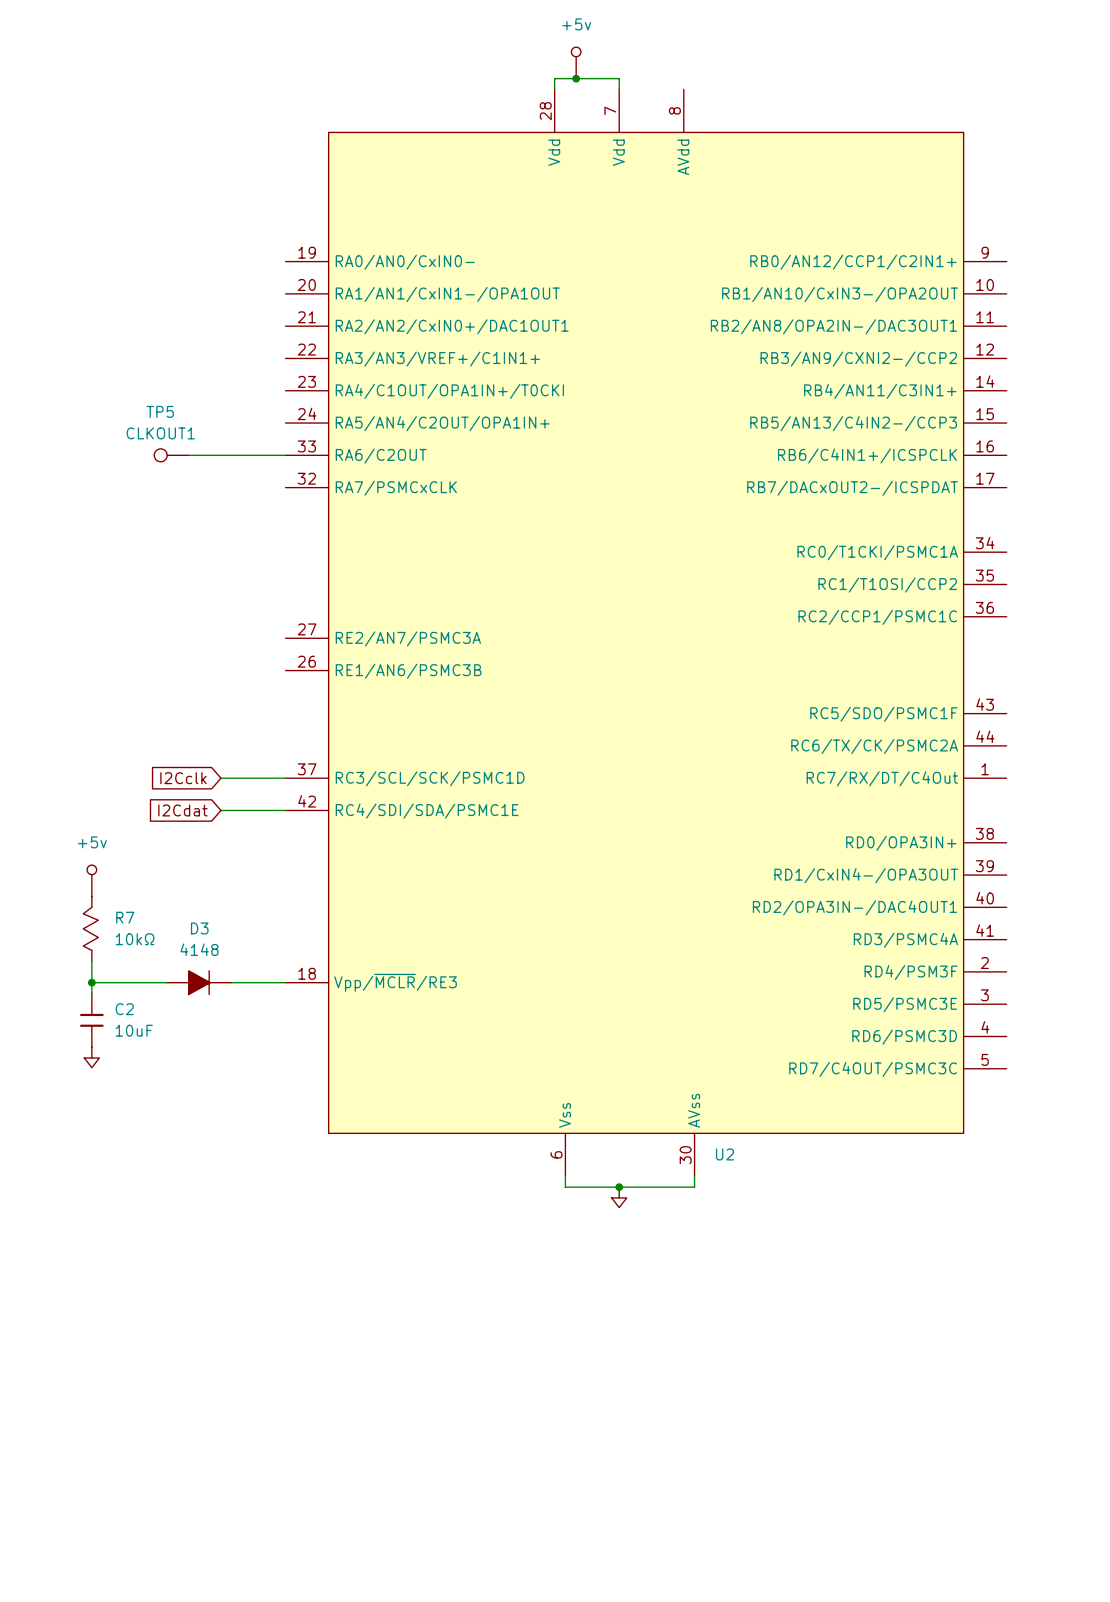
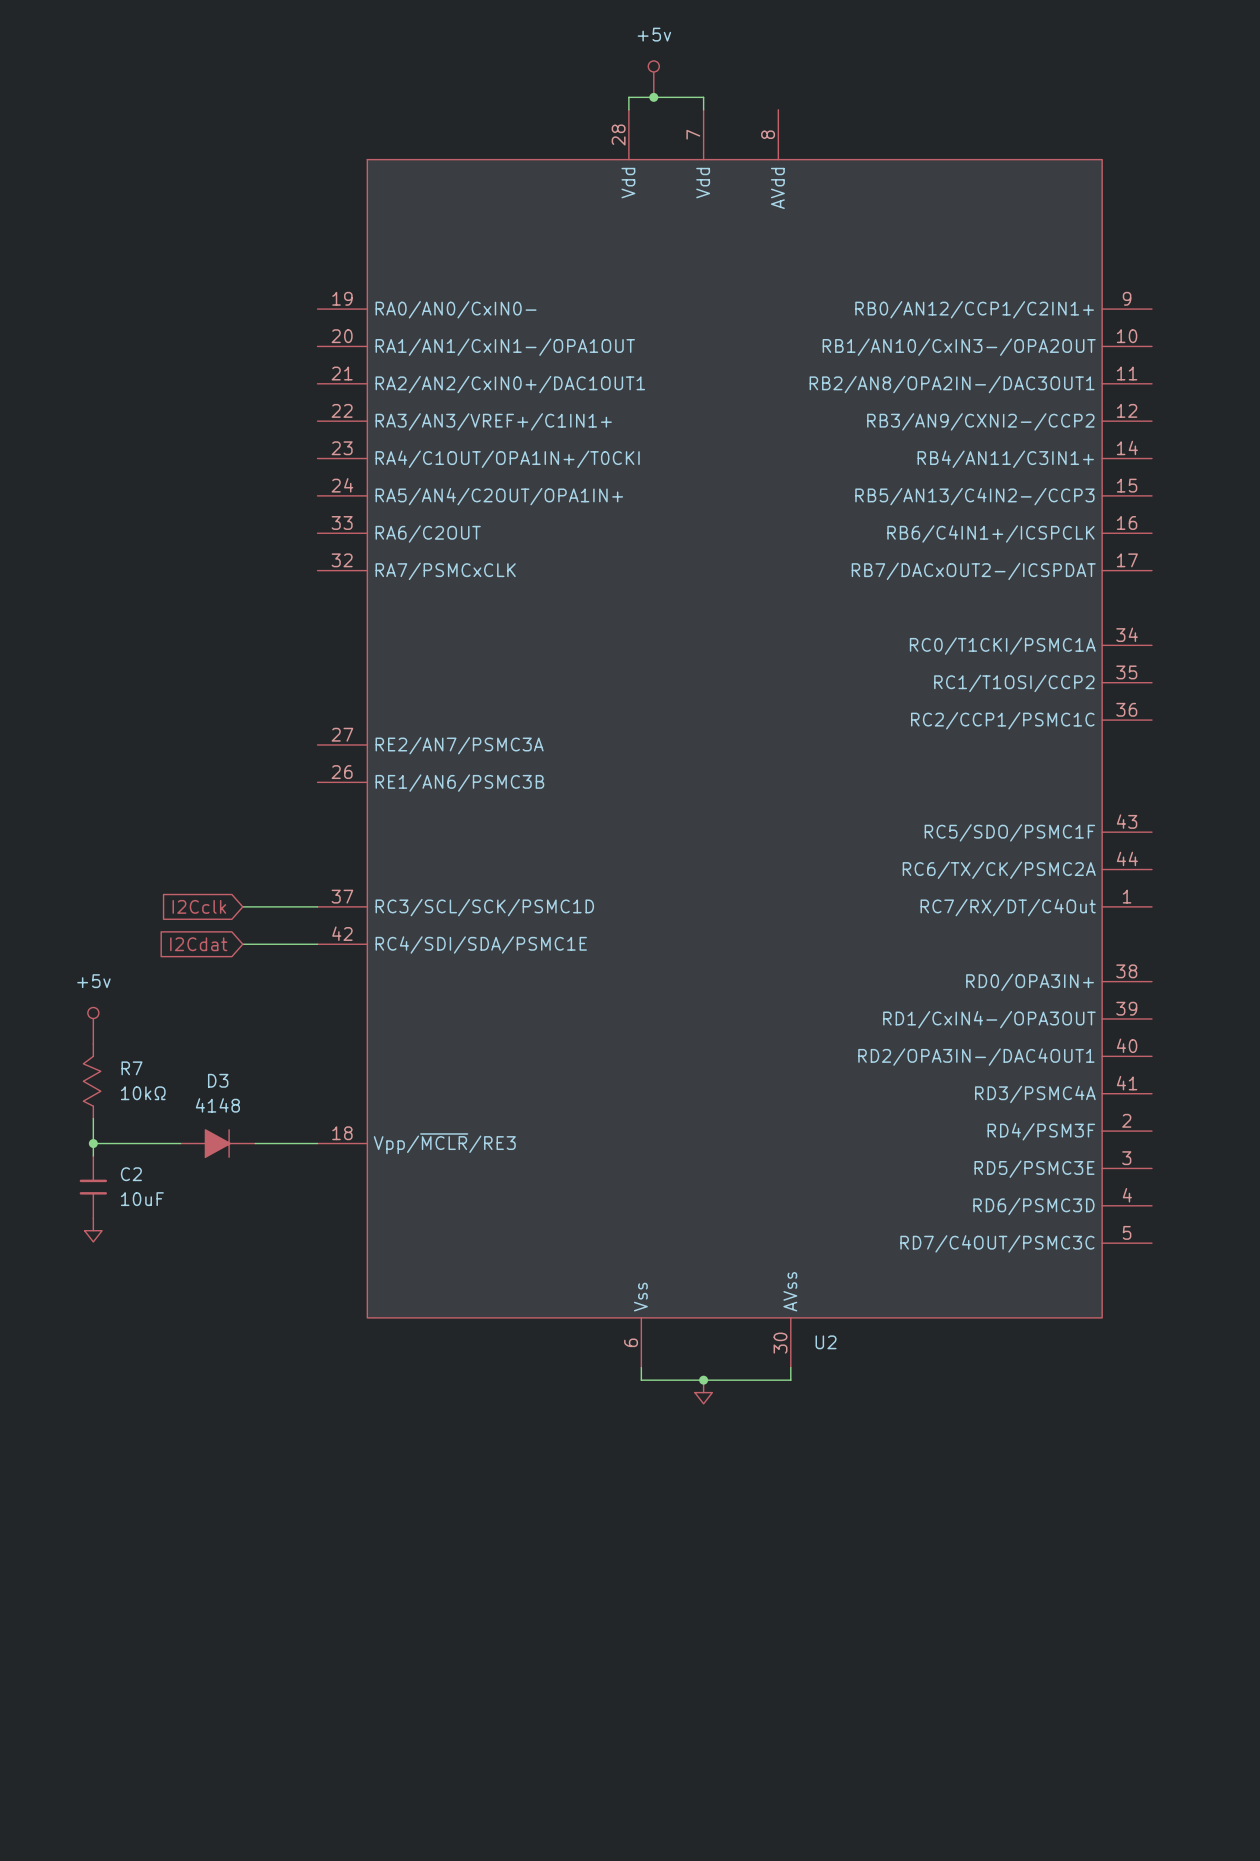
TP5: CLKOUT1 (171, 455) -> none
wire: (188, 455) (285, 455) -> none

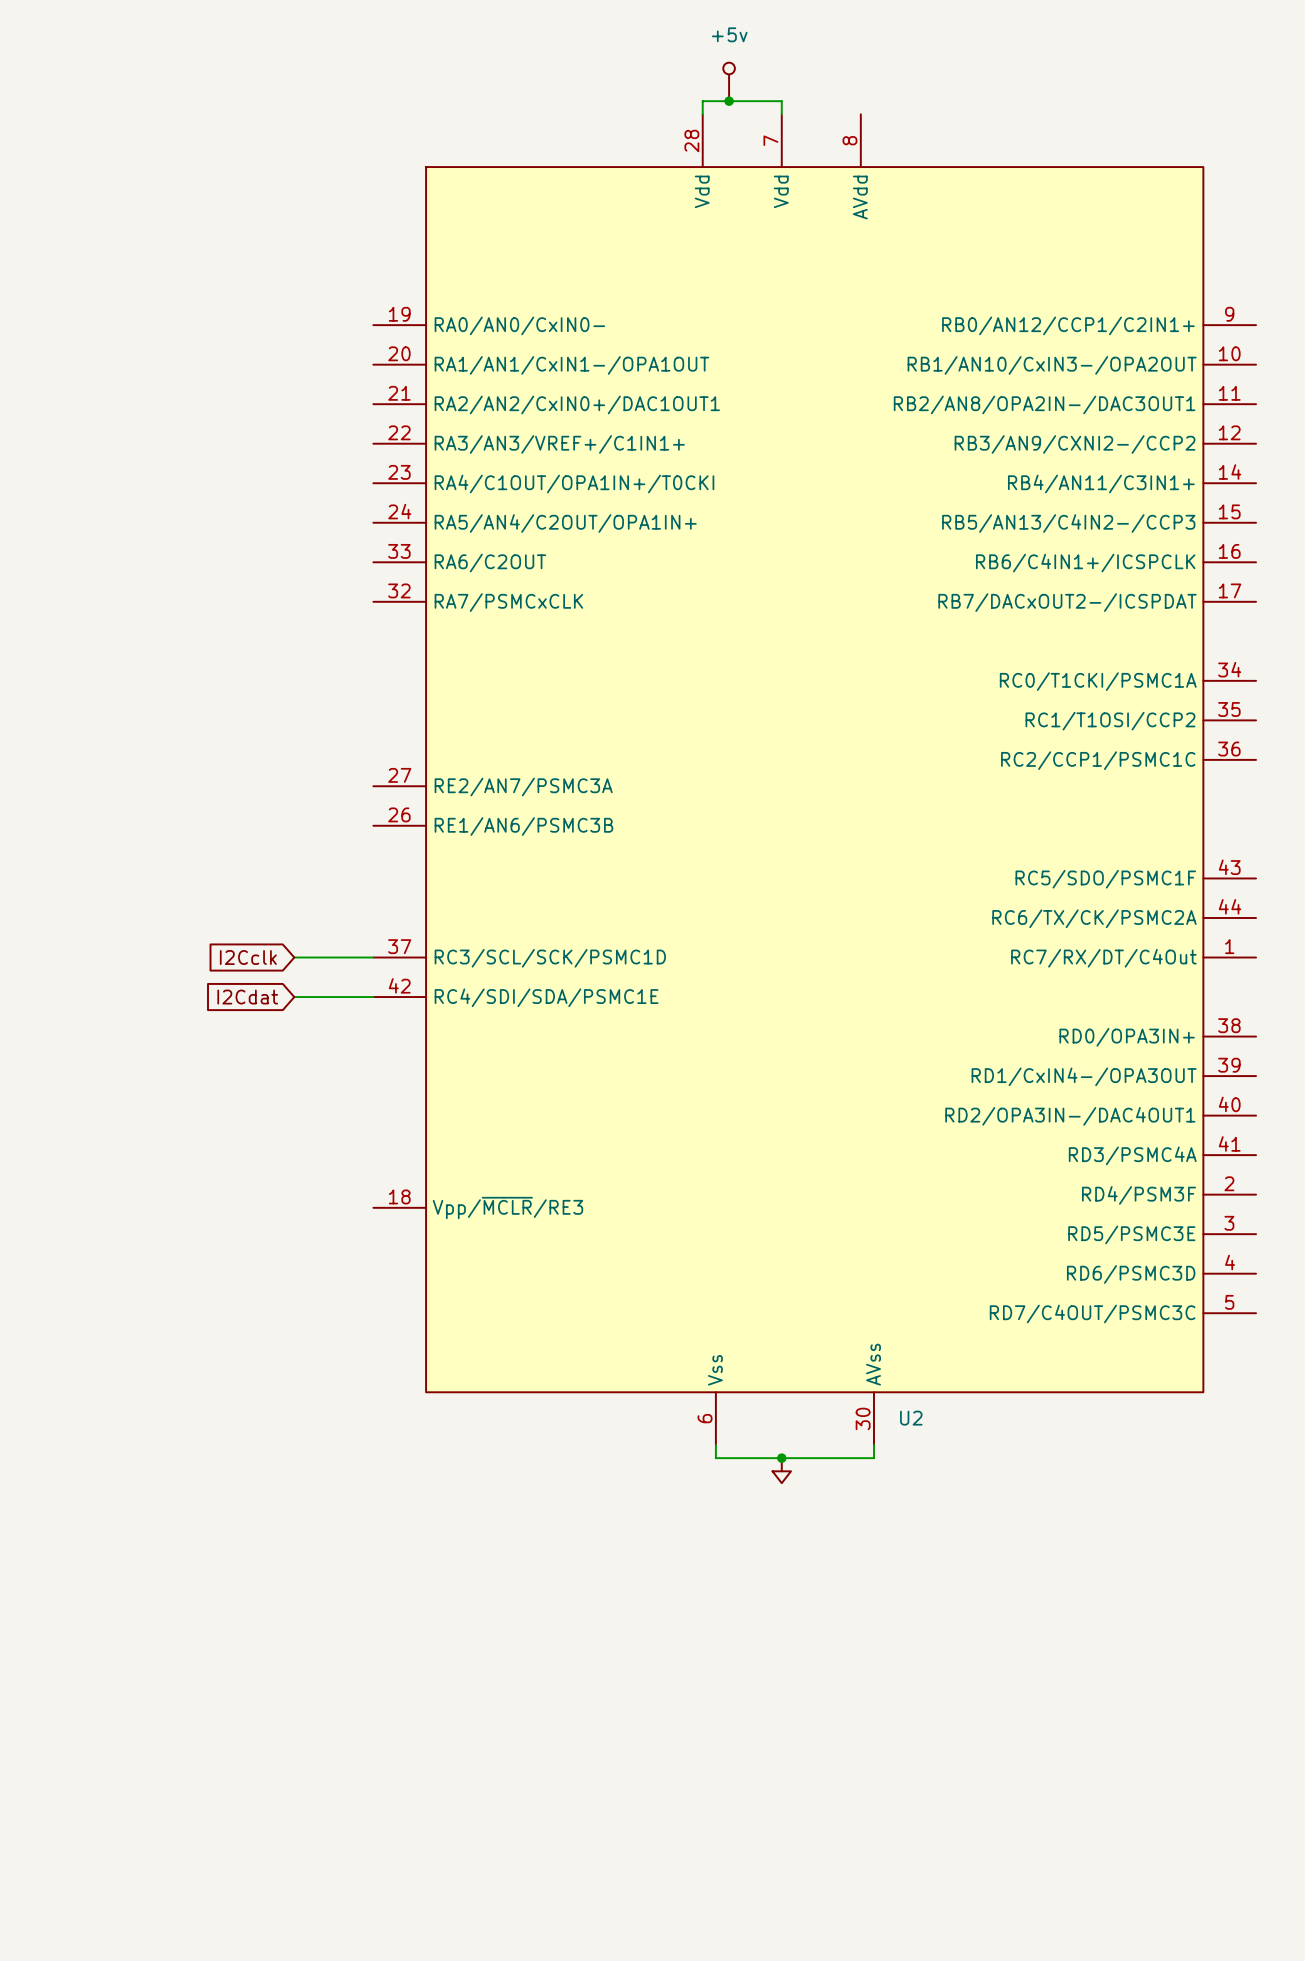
power symbol: +5v (93, 1025) -> none
R7: 10kΩ (92, 1081) -> none
wire: (93, 1118) (93, 1155) -> none
wire: (93, 1143) (180, 1143) -> none
junction: (93, 1143) -> none
D3: 4148 (217, 1143) -> none
wire: (255, 1143) (317, 1143) -> none
C2: 10uF (93, 1187) -> none
power symbol: (93, 1230) -> none

